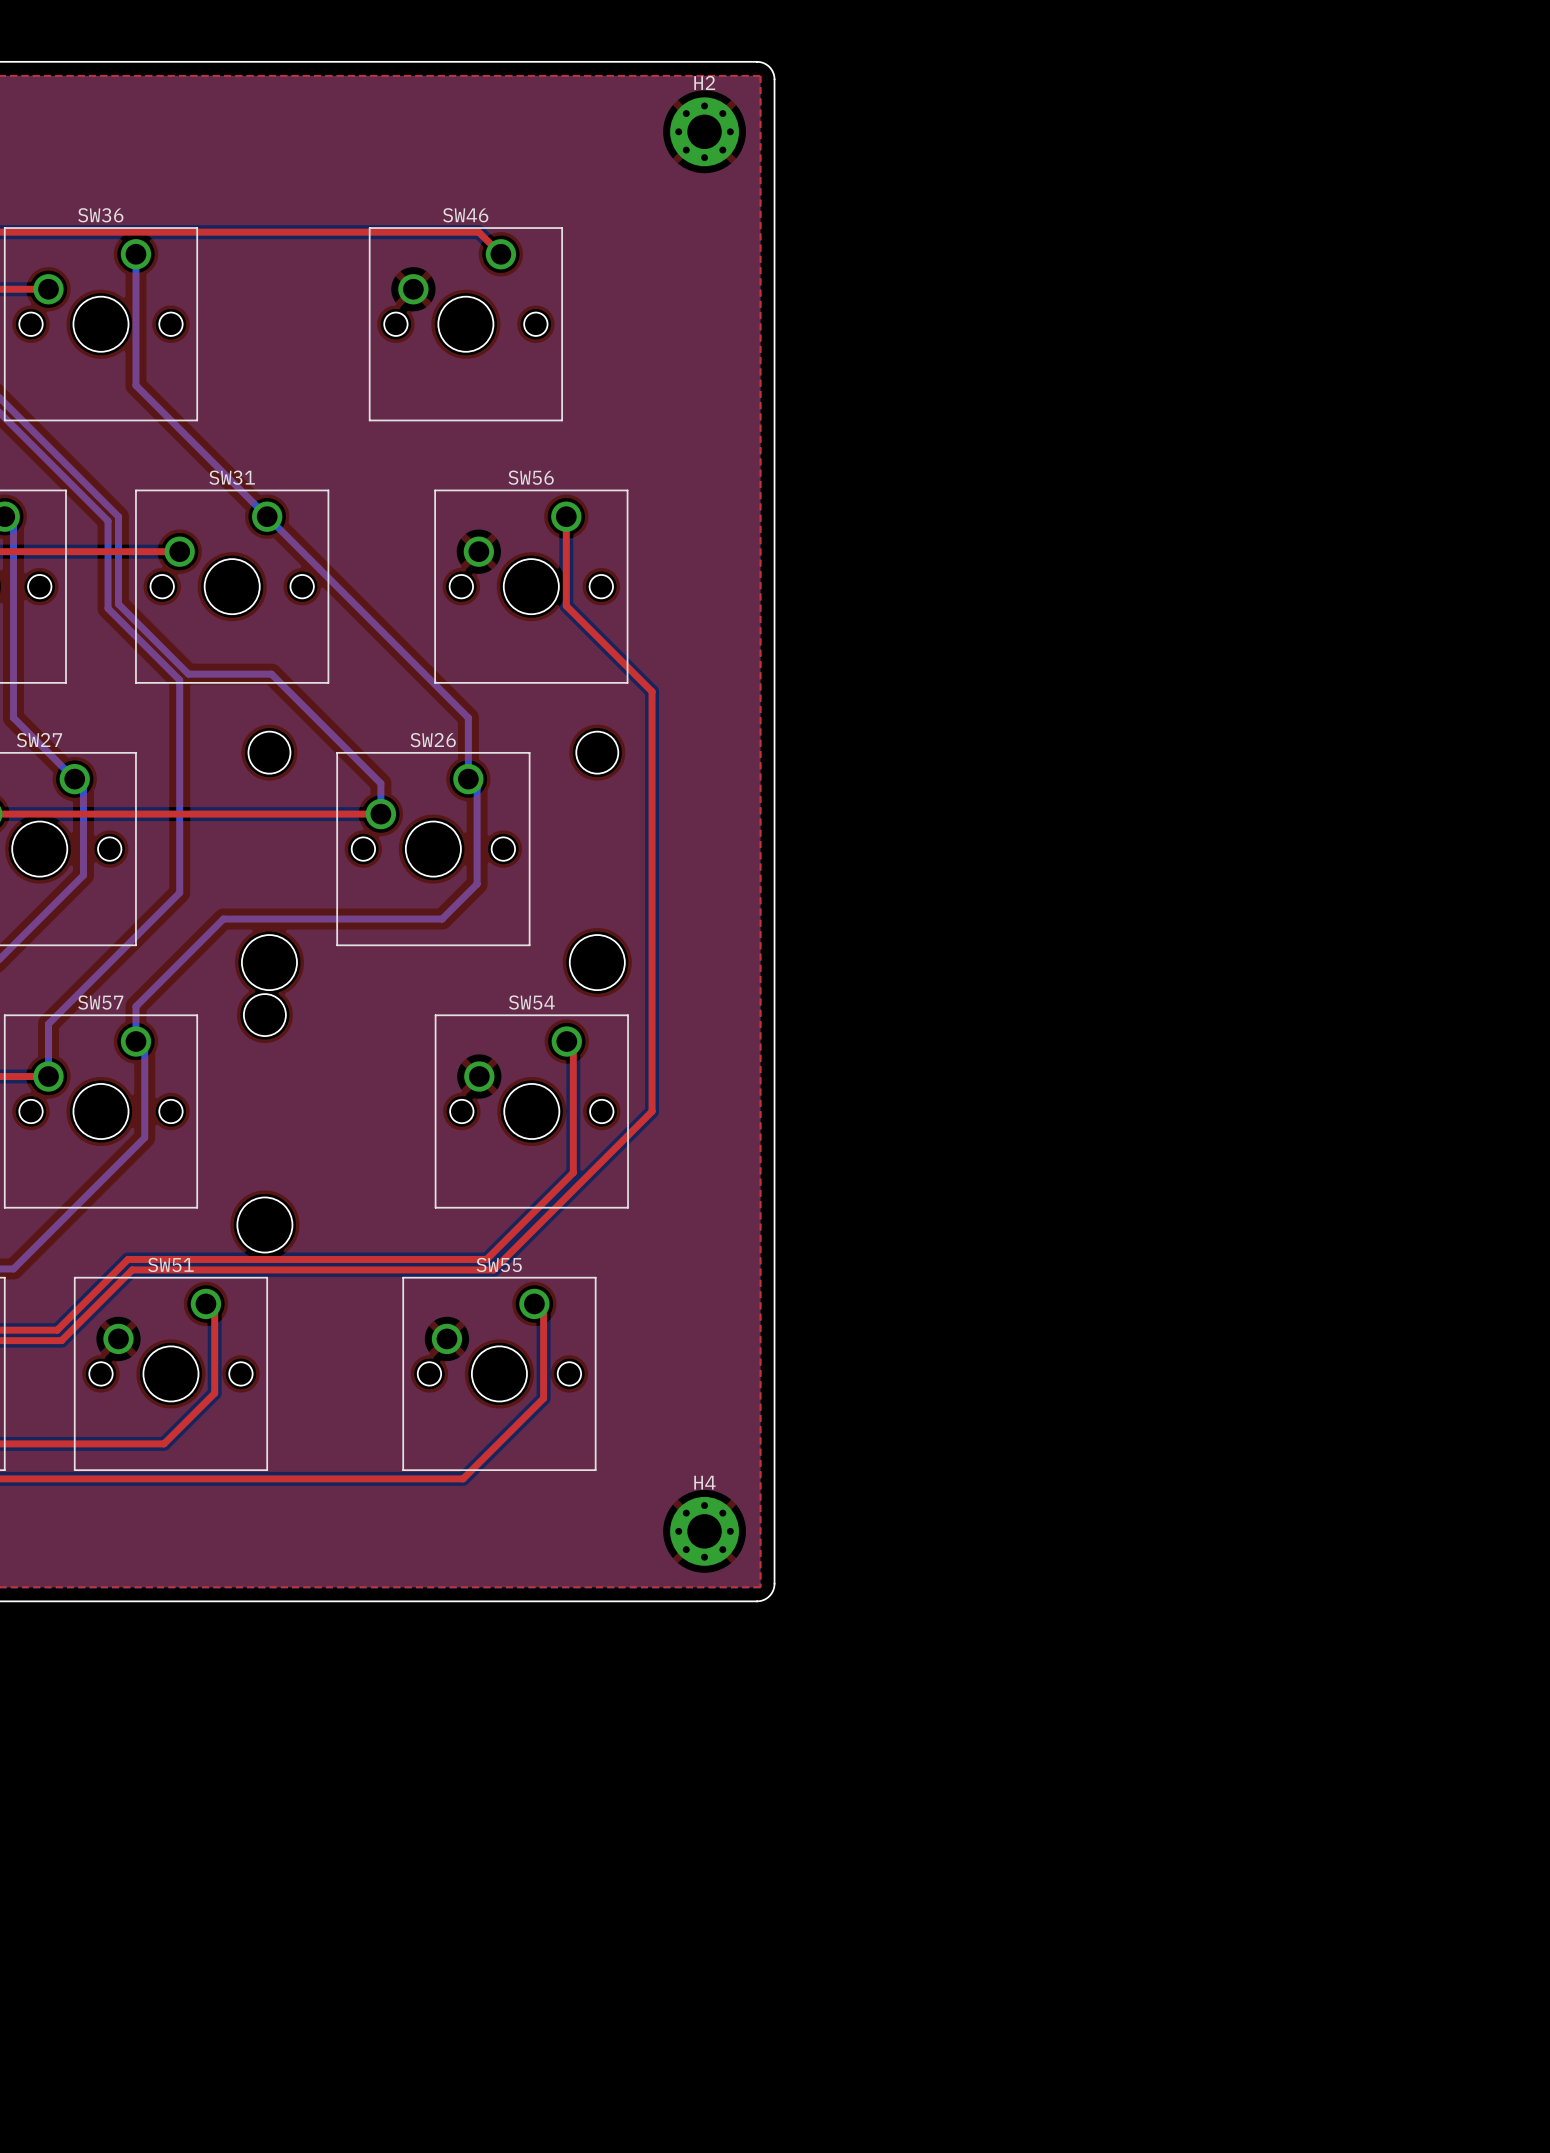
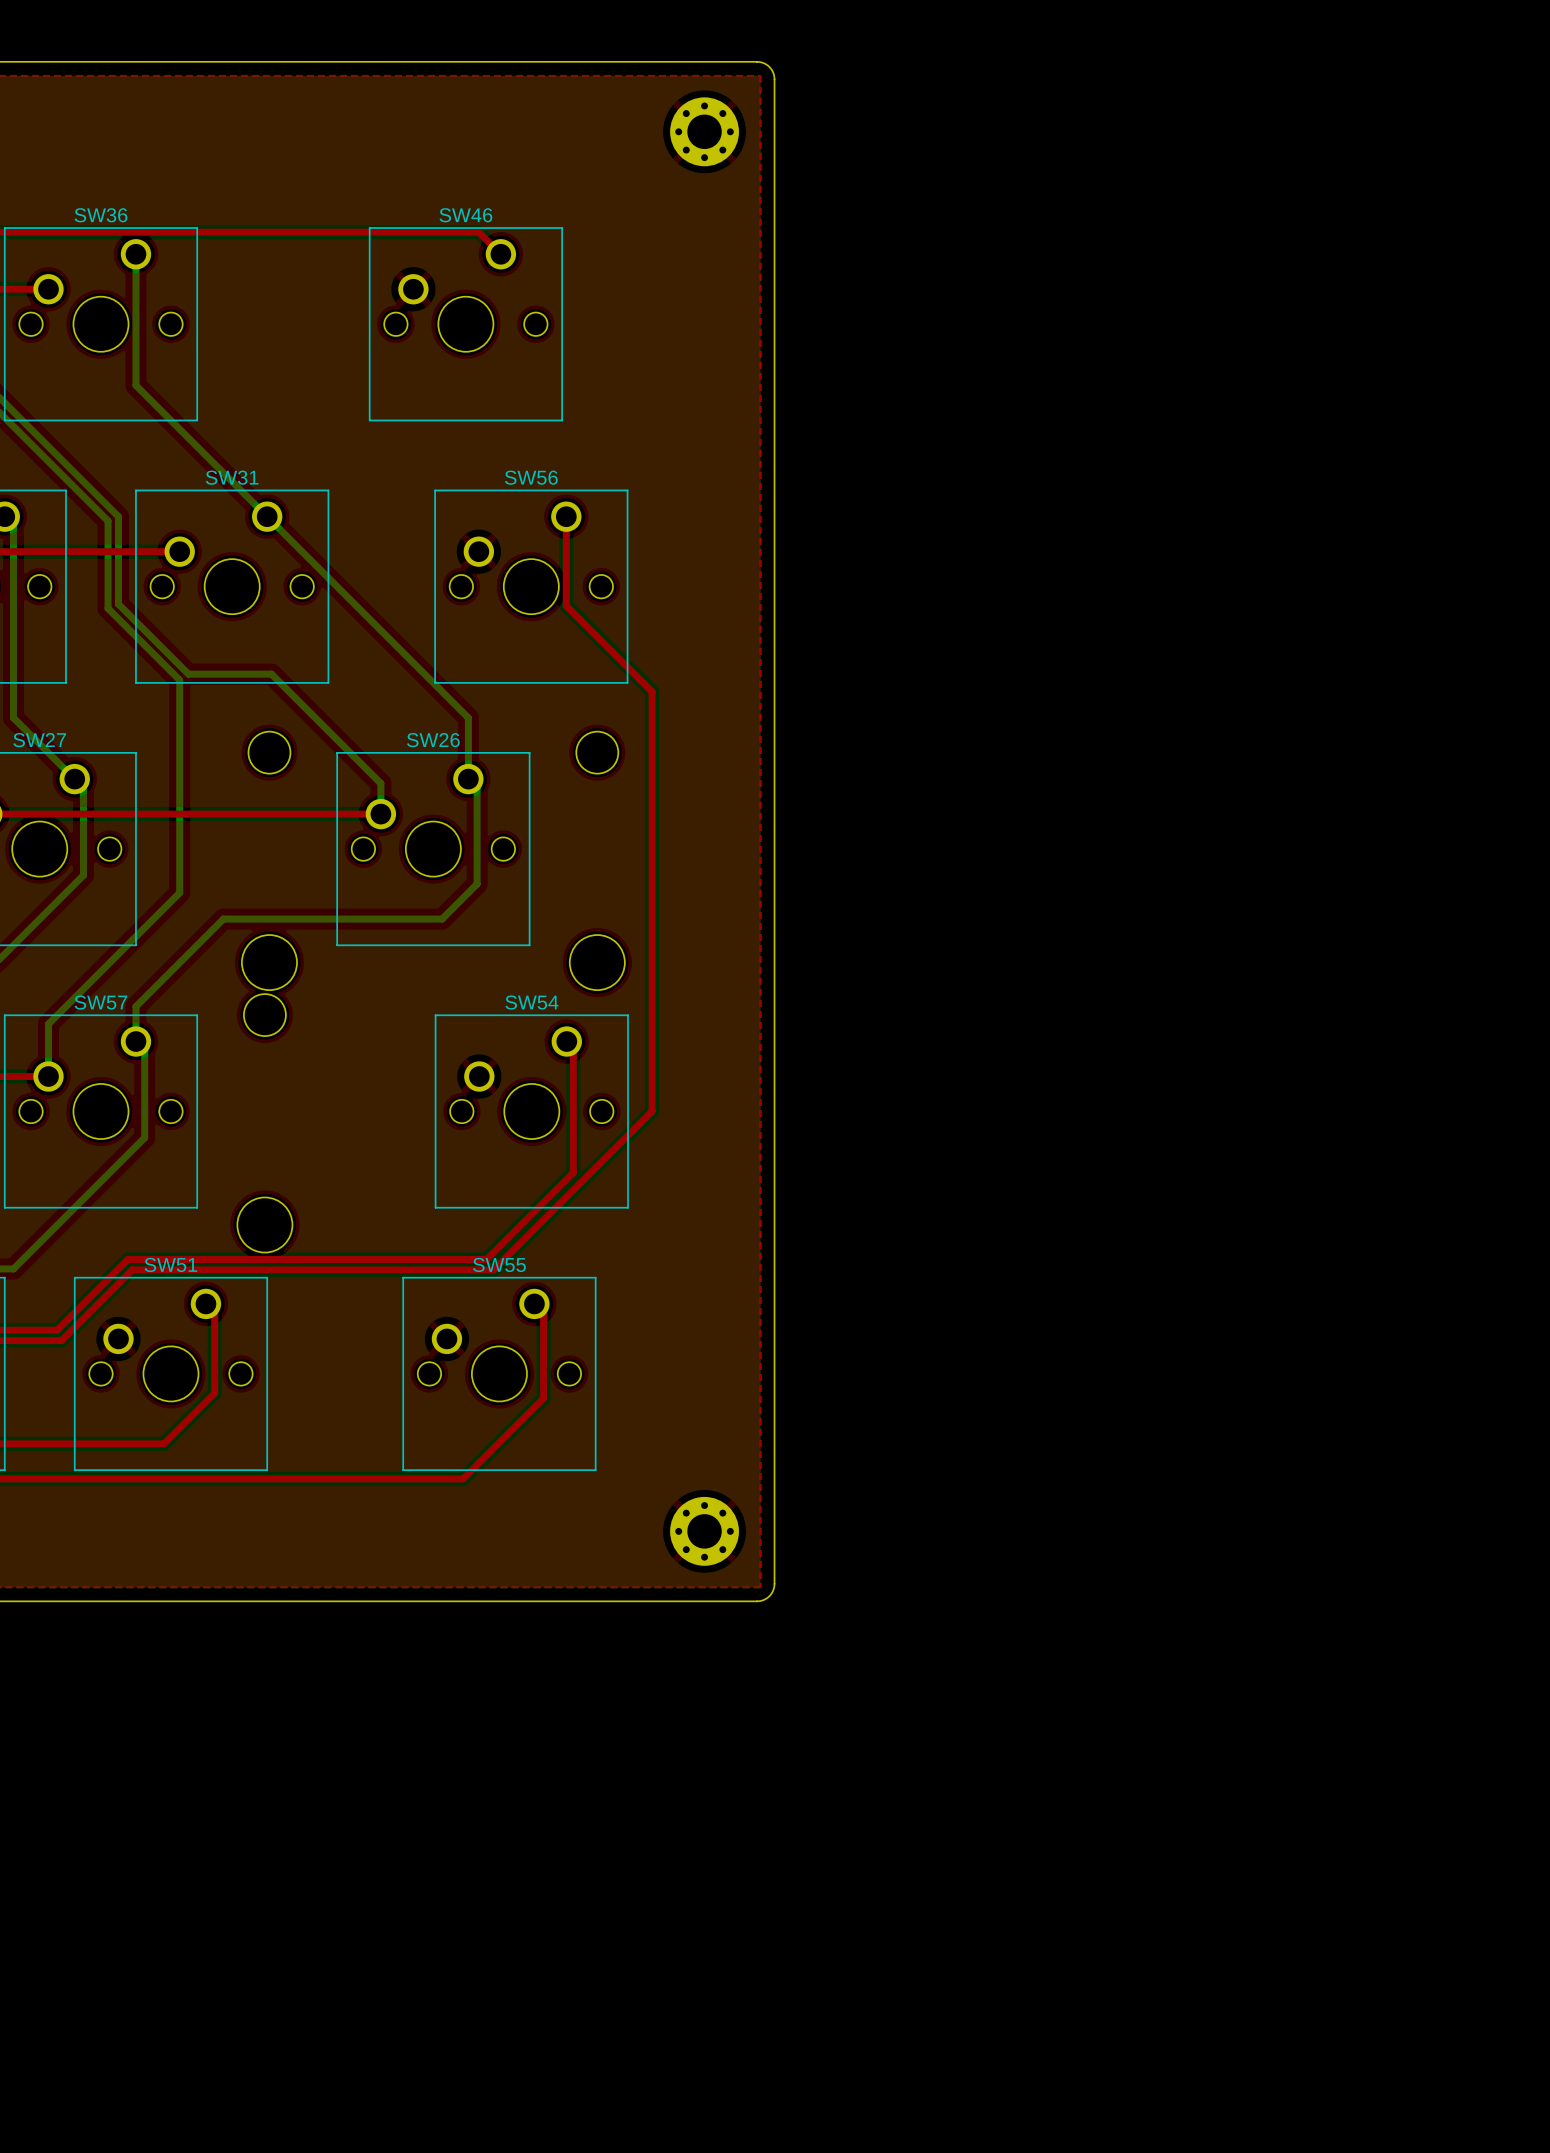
H2 name: H2 (704, 82) -> none
H4 name: H4 (704, 1482) -> none

